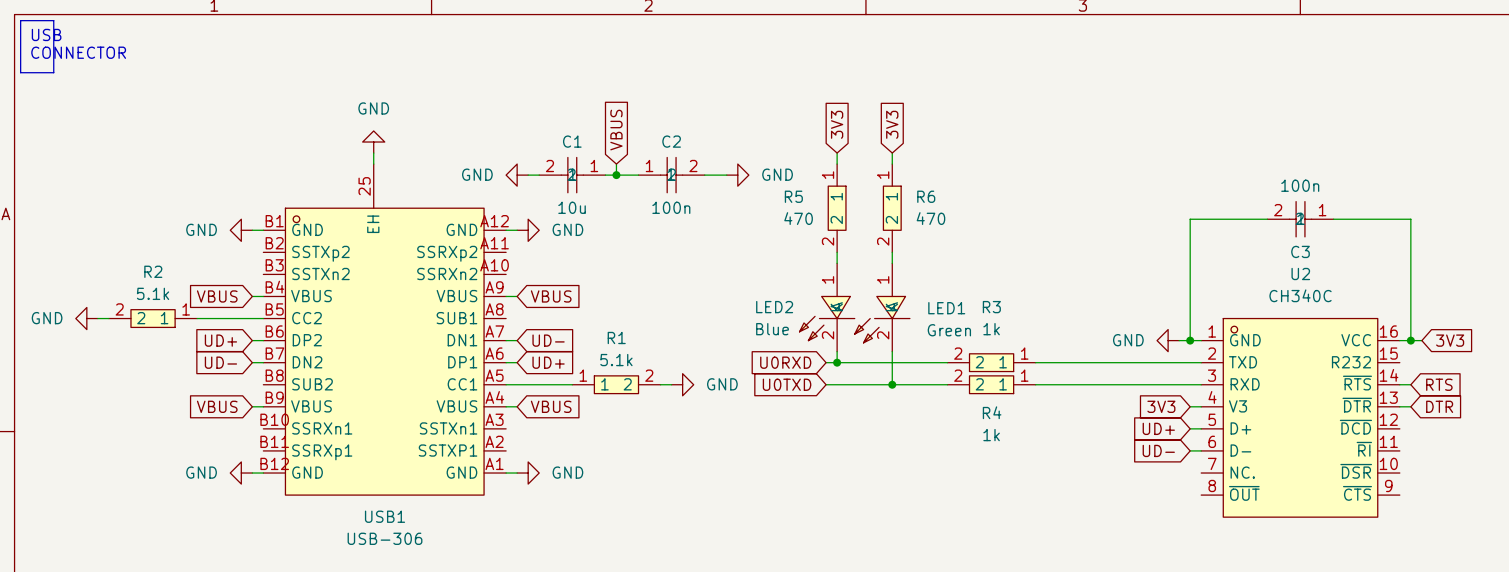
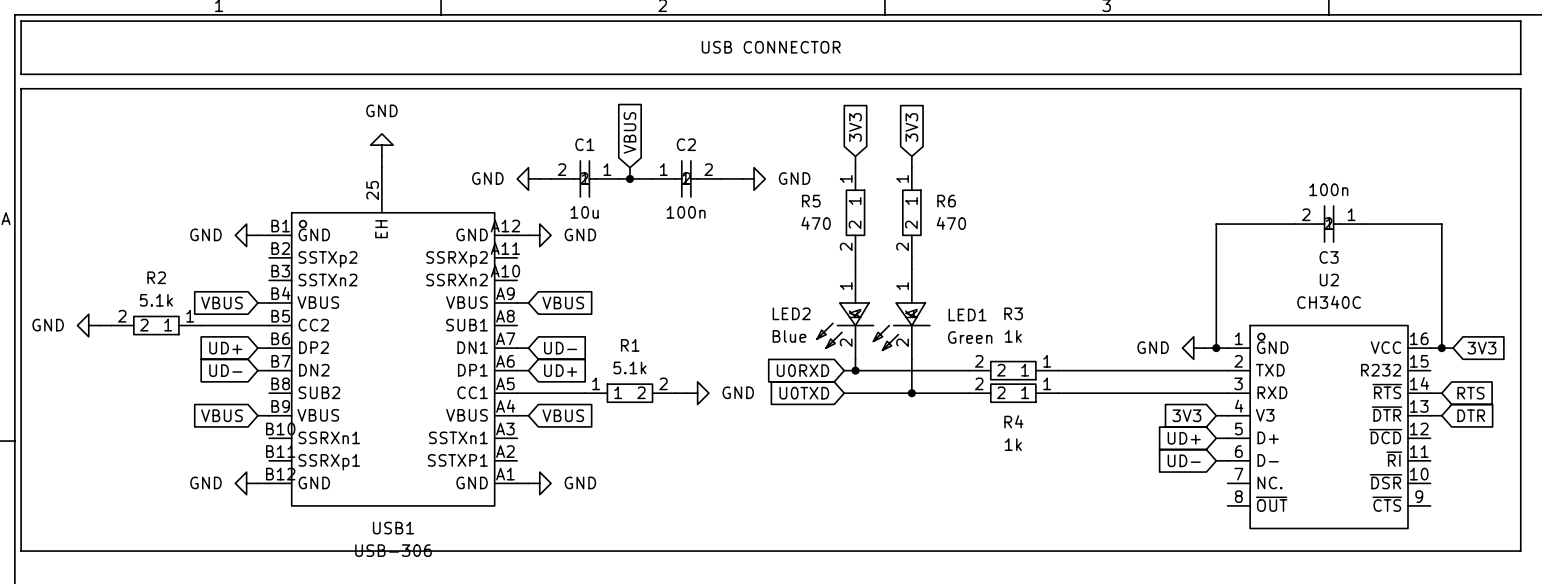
line: (53, 20) (53, 72) -> (54, 21) (1520, 21) (1520, 74) (54, 74)
text: USB (46, 34) -> none
text: none -> USB CONNECTOR (771, 47)
text: CONNECTOR (78, 52) -> none
line: none -> (21, 88) (1520, 88) (1520, 551) (21, 551) (21, 88)

